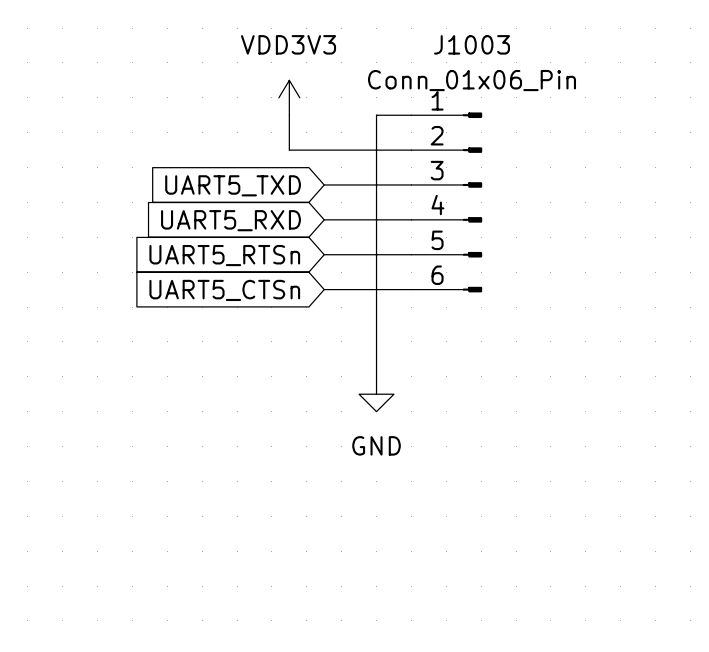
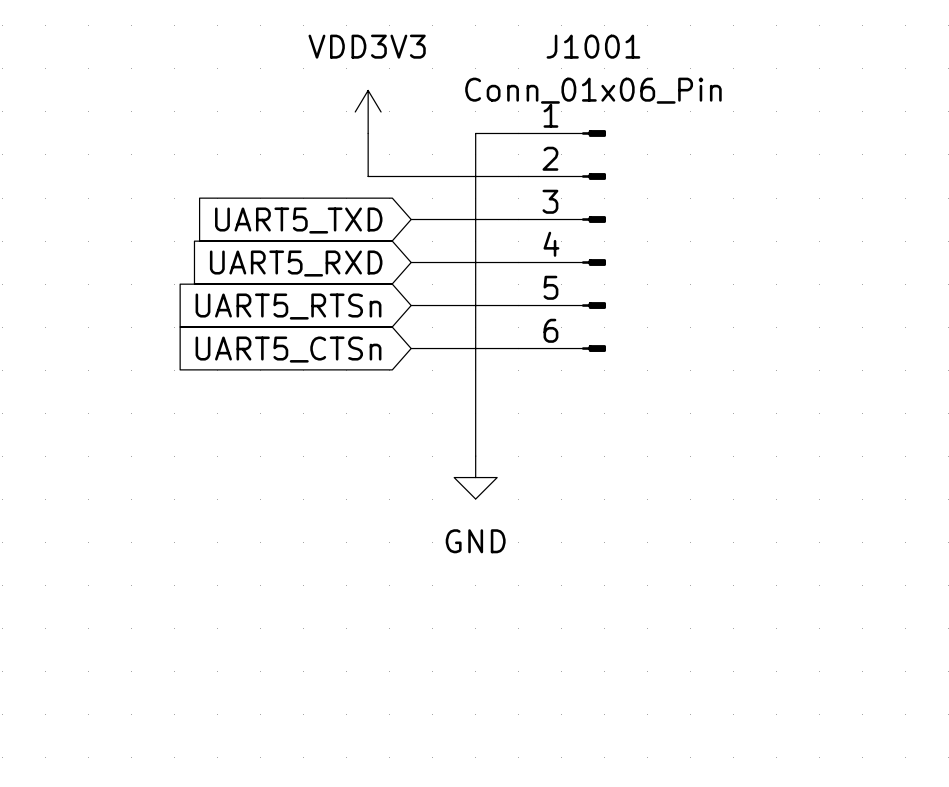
J1003 name: J1003 (472, 44) -> J1001 (593, 46)

